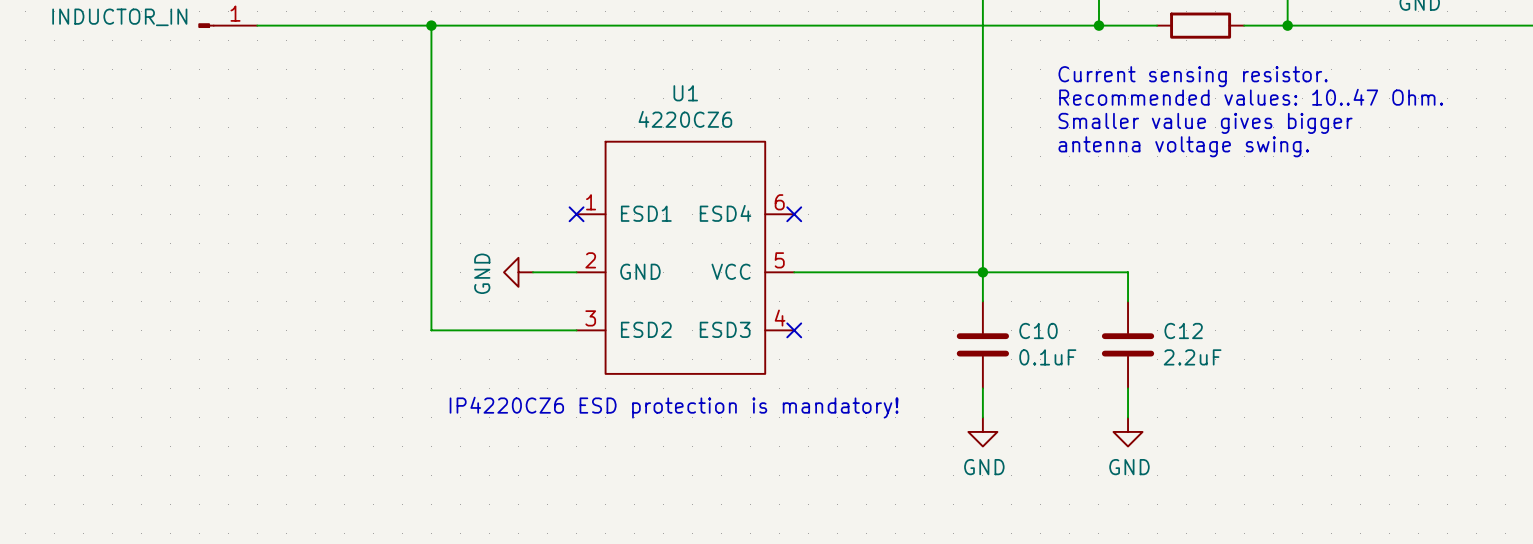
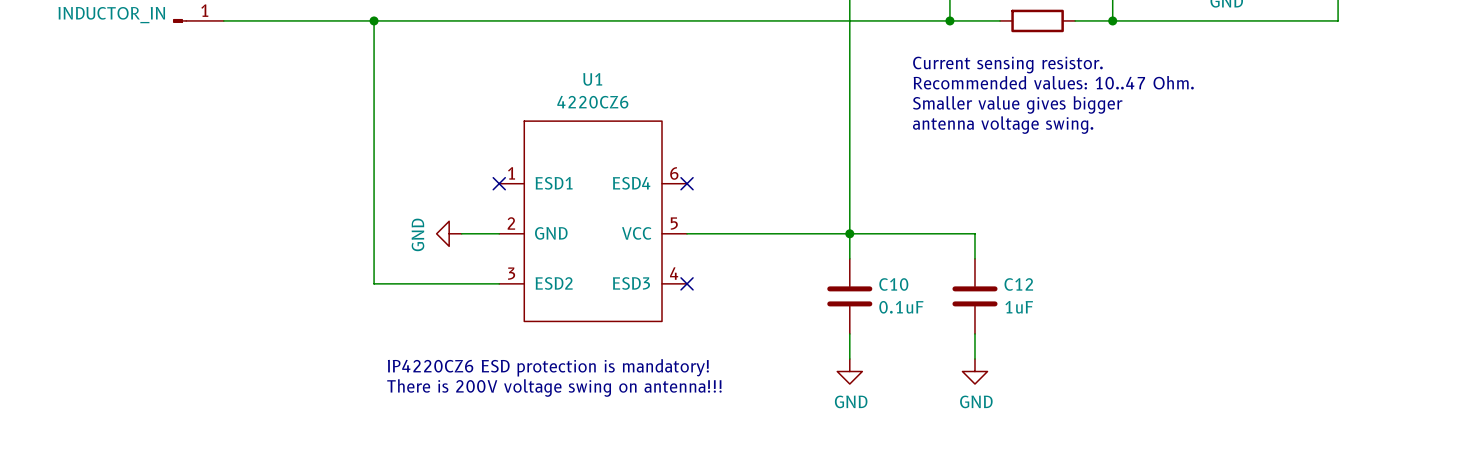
C12 value: 2.2uF (1192, 357) -> 1uF (1019, 307)
text position: IP4220CZ6 ESD protection is mandatory! (674, 407) -> IP4220CZ6 ESD protection is mandatory! (548, 367)
text: none -> There is 200V voltage swing on antenna!!! (554, 388)

